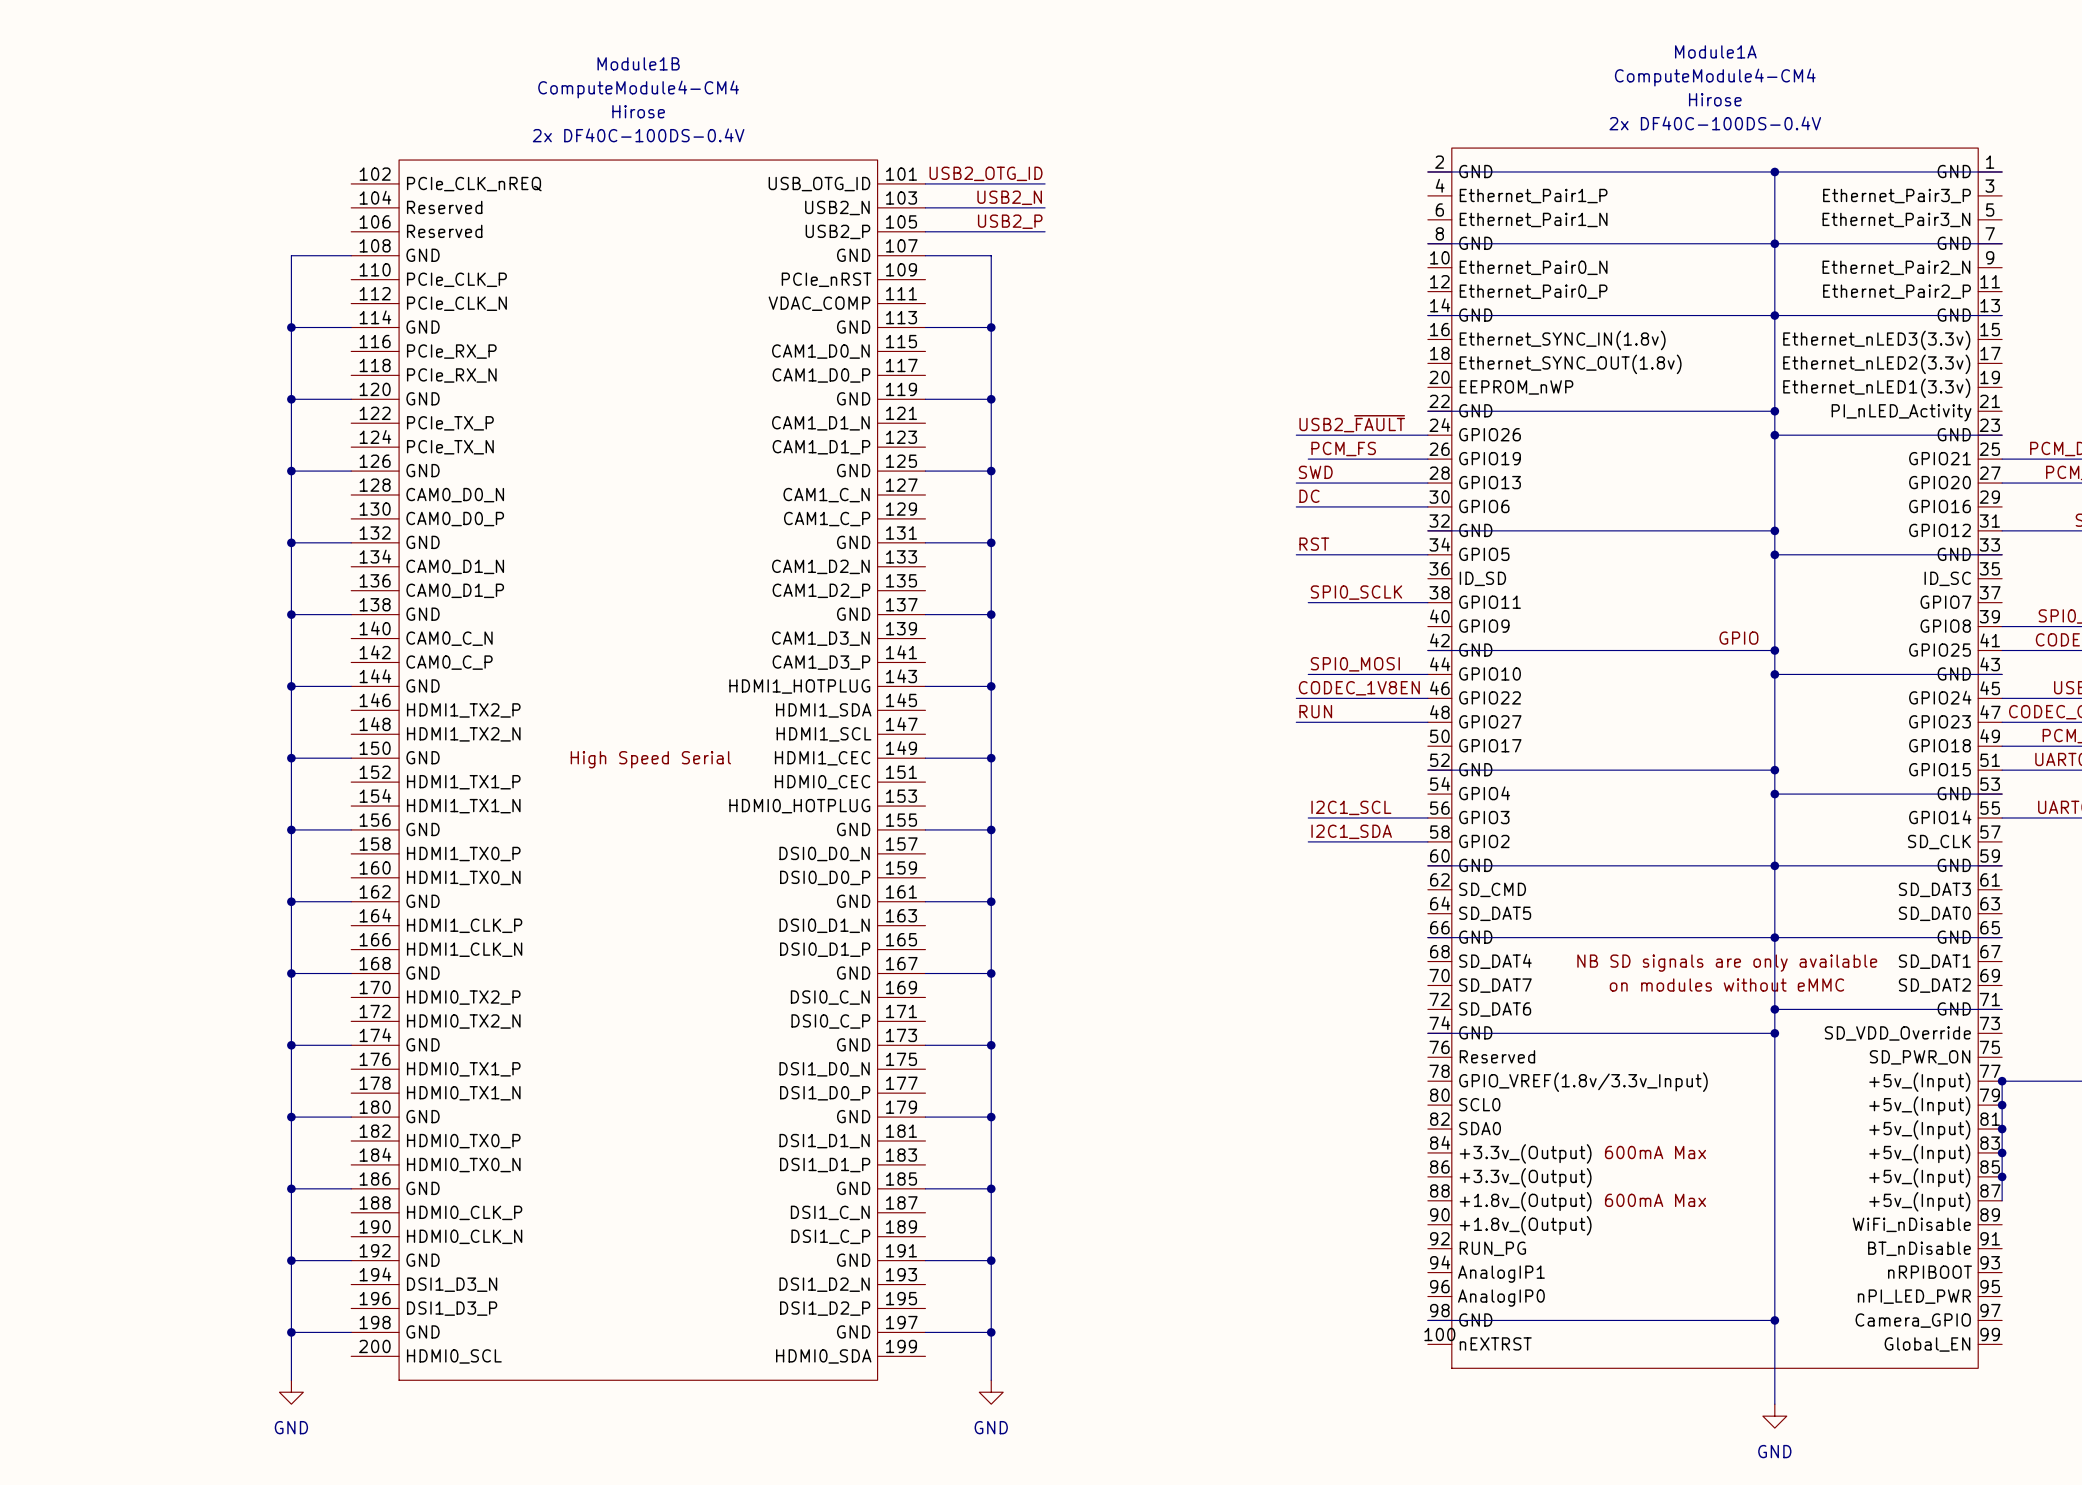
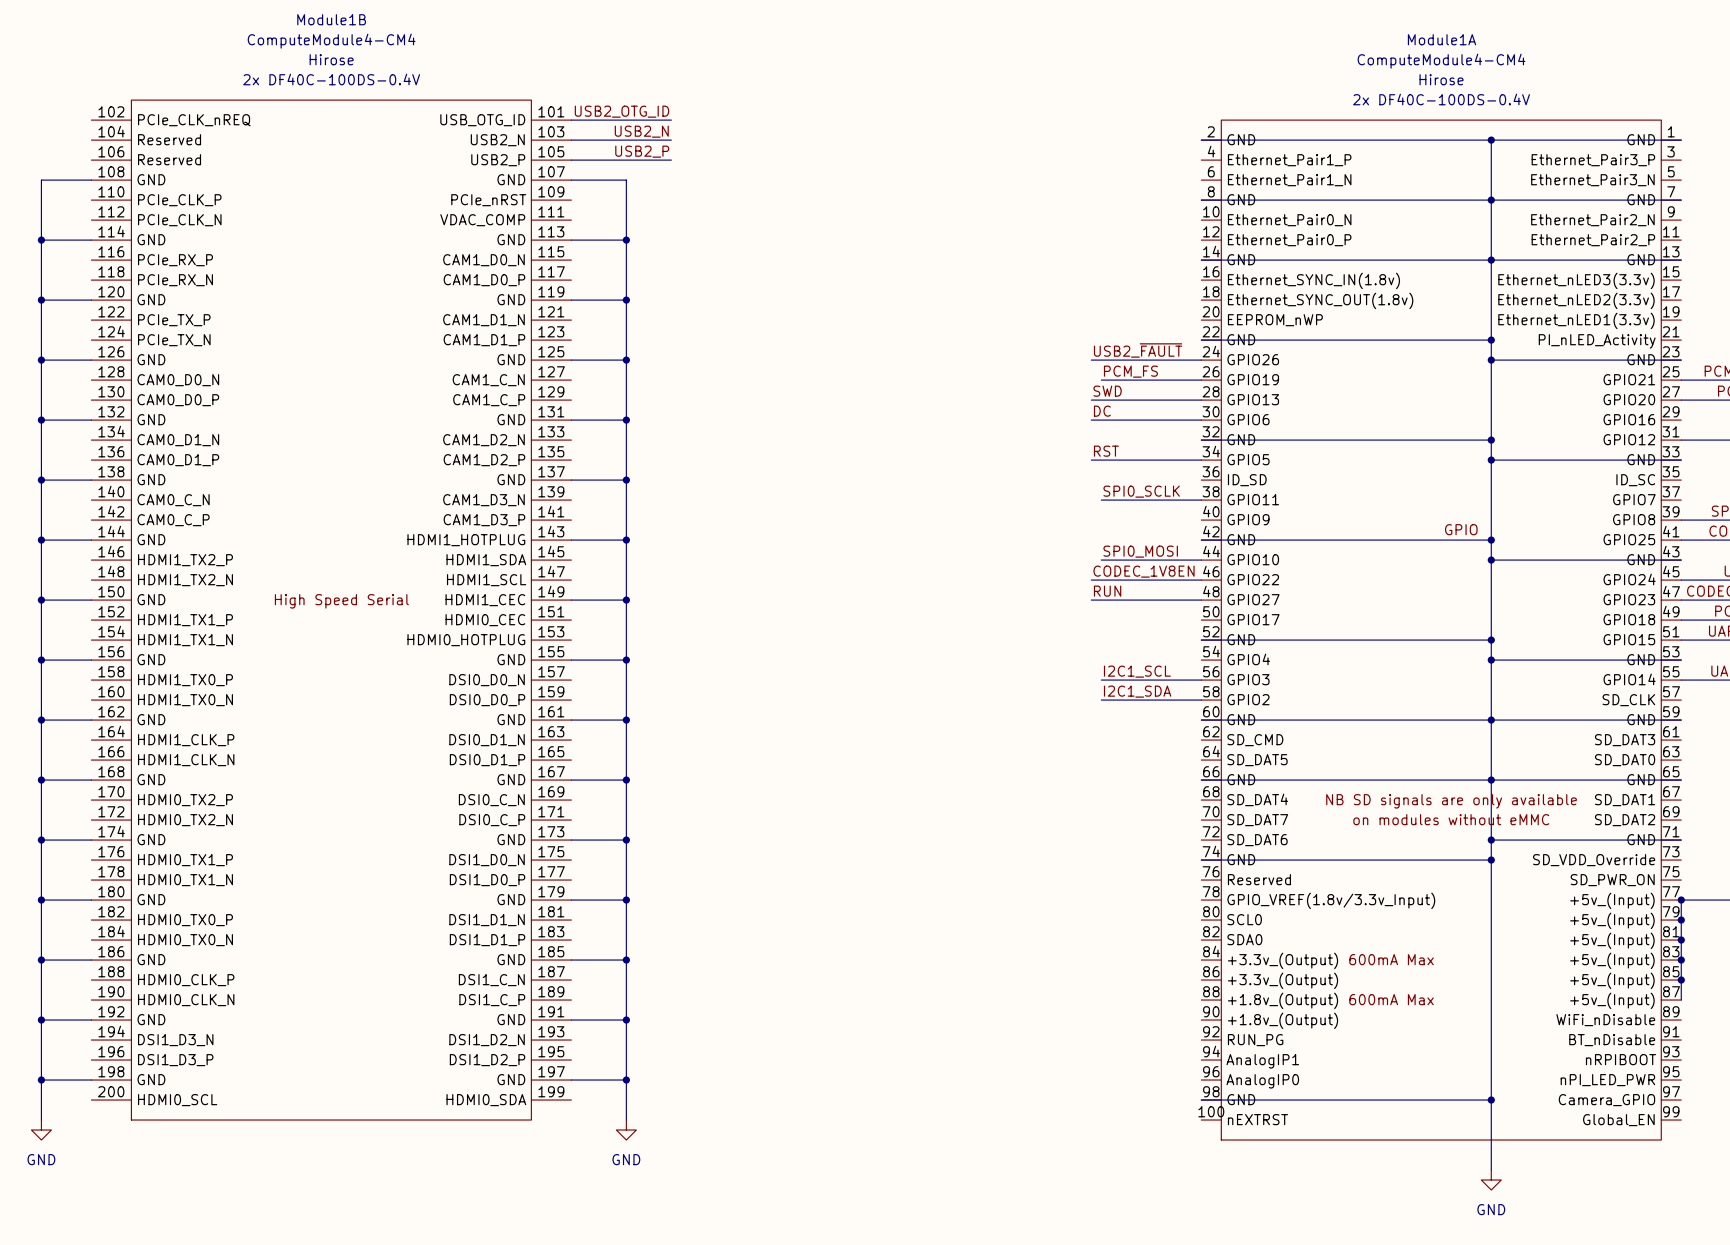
label: none -> USB2_OTG_ID (622, 111)
wire: none -> (571, 120) (671, 120)
label: none -> USB2_N (641, 131)
wire: none -> (571, 140) (671, 140)
label: USB2_OTG_ID (986, 173) -> none
wire: (925, 183) (1045, 183) -> none
label: none -> USB2_P (642, 151)
wire: none -> (571, 160) (671, 160)
label: USB2_N (1009, 197) -> none
wire: (925, 207) (1045, 207) -> none
wire: none -> (91, 180) (41, 180) (41, 1120)
wire: none -> (571, 180) (626, 180) (626, 1120)
label: USB2_P (1010, 221) -> none
wire: (925, 231) (1045, 231) -> none
wire: (351, 255) (291, 255) (291, 1380) -> none
wire: (925, 255) (991, 255) (991, 1380) -> none
wire: none -> (41, 240) (91, 240)
junction: none -> (41, 240)
wire: none -> (571, 240) (626, 240)
junction: none -> (626, 240)
wire: (291, 327) (351, 327) -> none
junction: (291, 327) -> none
wire: (925, 327) (991, 327) -> none
junction: (991, 327) -> none
wire: none -> (41, 300) (91, 300)
junction: none -> (41, 300)
wire: none -> (571, 300) (626, 300)
junction: none -> (626, 300)
wire: (291, 399) (351, 399) -> none
junction: (291, 399) -> none
wire: (925, 399) (991, 399) -> none
junction: (991, 399) -> none
wire: none -> (41, 360) (91, 360)
junction: none -> (41, 360)
wire: none -> (571, 360) (626, 360)
junction: none -> (626, 360)
wire: (291, 471) (351, 471) -> none
junction: (291, 471) -> none
wire: (925, 471) (991, 471) -> none
junction: (991, 471) -> none
wire: none -> (41, 420) (91, 420)
junction: none -> (41, 420)
wire: none -> (571, 420) (626, 420)
junction: none -> (626, 420)
wire: (291, 542) (351, 542) -> none
junction: (291, 542) -> none
wire: (925, 542) (991, 542) -> none
junction: (991, 542) -> none
wire: none -> (41, 480) (91, 480)
junction: none -> (41, 480)
wire: none -> (571, 480) (626, 480)
junction: none -> (626, 480)
wire: (291, 614) (351, 614) -> none
junction: (291, 614) -> none
wire: (925, 614) (991, 614) -> none
junction: (991, 614) -> none
wire: none -> (41, 540) (91, 540)
junction: none -> (41, 540)
wire: none -> (571, 540) (626, 540)
junction: none -> (626, 540)
wire: (291, 686) (351, 686) -> none
junction: (291, 686) -> none
wire: (925, 686) (991, 686) -> none
junction: (991, 686) -> none
wire: none -> (41, 600) (91, 600)
junction: none -> (41, 600)
wire: none -> (571, 600) (626, 600)
junction: none -> (626, 600)
wire: (291, 758) (351, 758) -> none
junction: (291, 758) -> none
wire: (925, 758) (991, 758) -> none
junction: (991, 758) -> none
Module1B position: (638, 770) -> (331, 610)
wire: none -> (41, 660) (91, 660)
junction: none -> (41, 660)
wire: none -> (571, 660) (626, 660)
junction: none -> (626, 660)
wire: (291, 829) (351, 829) -> none
junction: (291, 829) -> none
wire: (925, 829) (991, 829) -> none
junction: (991, 829) -> none
wire: none -> (41, 720) (91, 720)
junction: none -> (41, 720)
wire: none -> (571, 720) (626, 720)
junction: none -> (626, 720)
wire: (291, 901) (351, 901) -> none
junction: (291, 901) -> none
wire: (925, 901) (991, 901) -> none
junction: (991, 901) -> none
wire: none -> (41, 780) (91, 780)
junction: none -> (41, 780)
wire: none -> (571, 780) (626, 780)
junction: none -> (626, 780)
wire: (291, 973) (351, 973) -> none
junction: (291, 973) -> none
wire: (925, 973) (991, 973) -> none
junction: (991, 973) -> none
wire: none -> (41, 840) (91, 840)
junction: none -> (41, 840)
wire: none -> (571, 840) (626, 840)
junction: none -> (626, 840)
wire: (291, 1045) (351, 1045) -> none
junction: (291, 1045) -> none
wire: (925, 1045) (991, 1045) -> none
junction: (991, 1045) -> none
wire: none -> (41, 900) (91, 900)
junction: none -> (41, 900)
wire: none -> (571, 900) (626, 900)
junction: none -> (626, 900)
wire: (291, 1117) (351, 1117) -> none
junction: (291, 1117) -> none
wire: (925, 1117) (991, 1117) -> none
junction: (991, 1117) -> none
wire: none -> (41, 960) (91, 960)
junction: none -> (41, 960)
wire: none -> (571, 960) (626, 960)
junction: none -> (626, 960)
wire: (291, 1188) (351, 1188) -> none
junction: (291, 1188) -> none
wire: (925, 1188) (991, 1188) -> none
junction: (991, 1188) -> none
wire: none -> (41, 1020) (91, 1020)
junction: none -> (41, 1020)
wire: none -> (571, 1020) (626, 1020)
junction: none -> (626, 1020)
wire: (291, 1260) (351, 1260) -> none
junction: (291, 1260) -> none
wire: (925, 1260) (991, 1260) -> none
junction: (991, 1260) -> none
wire: none -> (41, 1080) (91, 1080)
junction: none -> (41, 1080)
wire: none -> (571, 1080) (626, 1080)
junction: none -> (626, 1080)
wire: (291, 1332) (351, 1332) -> none
junction: (291, 1332) -> none
wire: (925, 1332) (991, 1332) -> none
junction: (991, 1332) -> none
power symbol: none -> GND (41, 1130)
power symbol: none -> GND (626, 1130)
power symbol: GND (291, 1392) -> none
power symbol: GND (991, 1392) -> none

